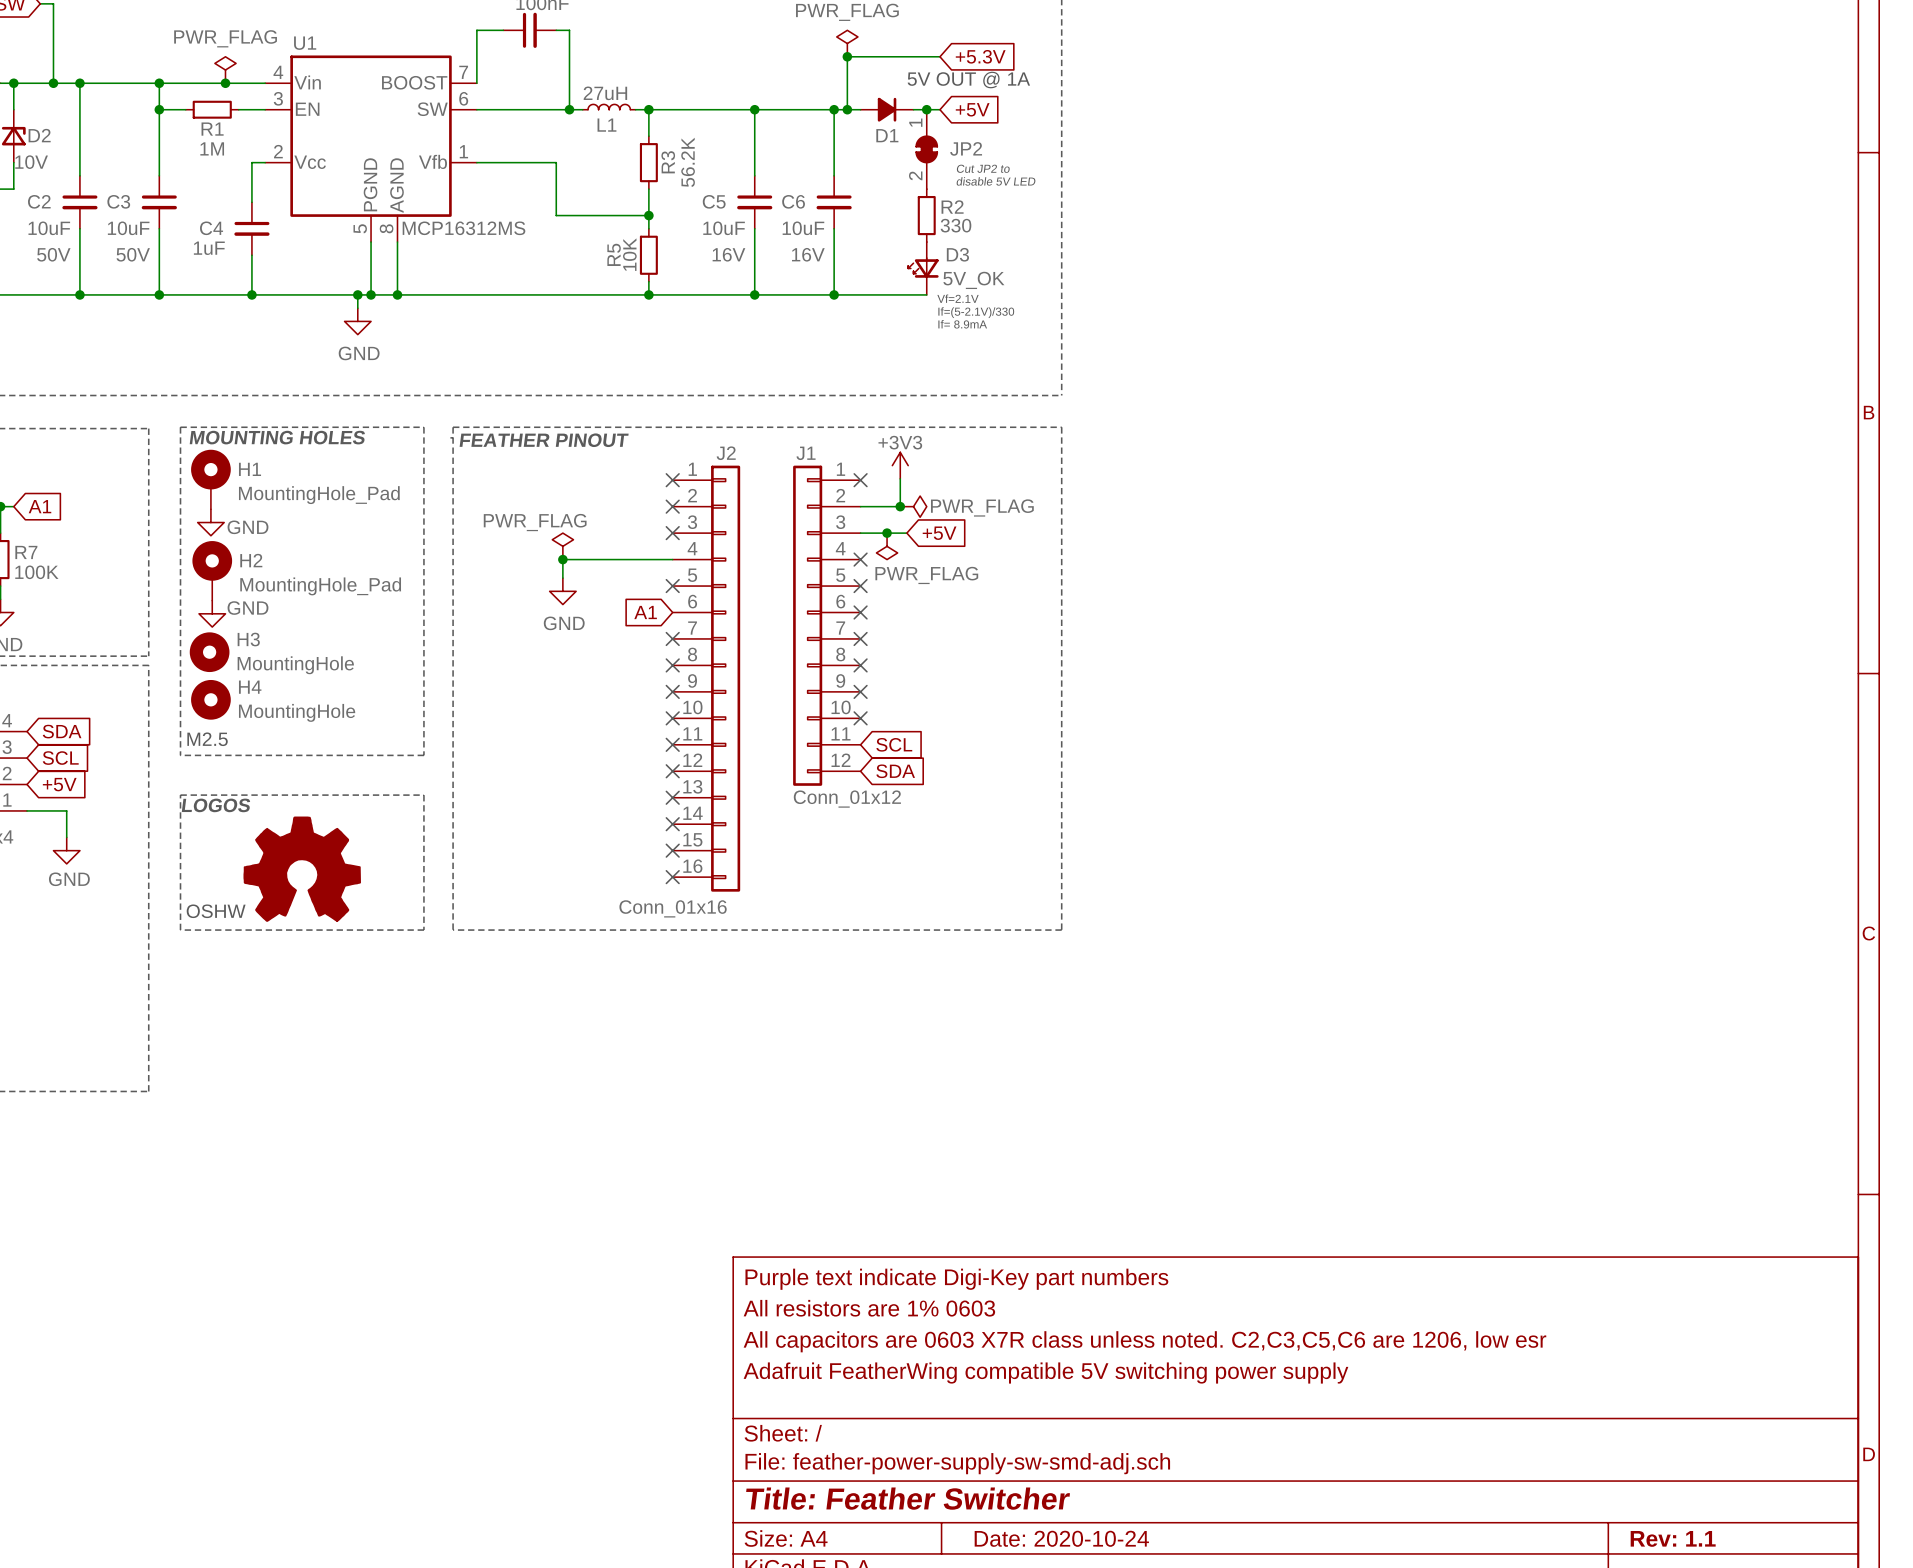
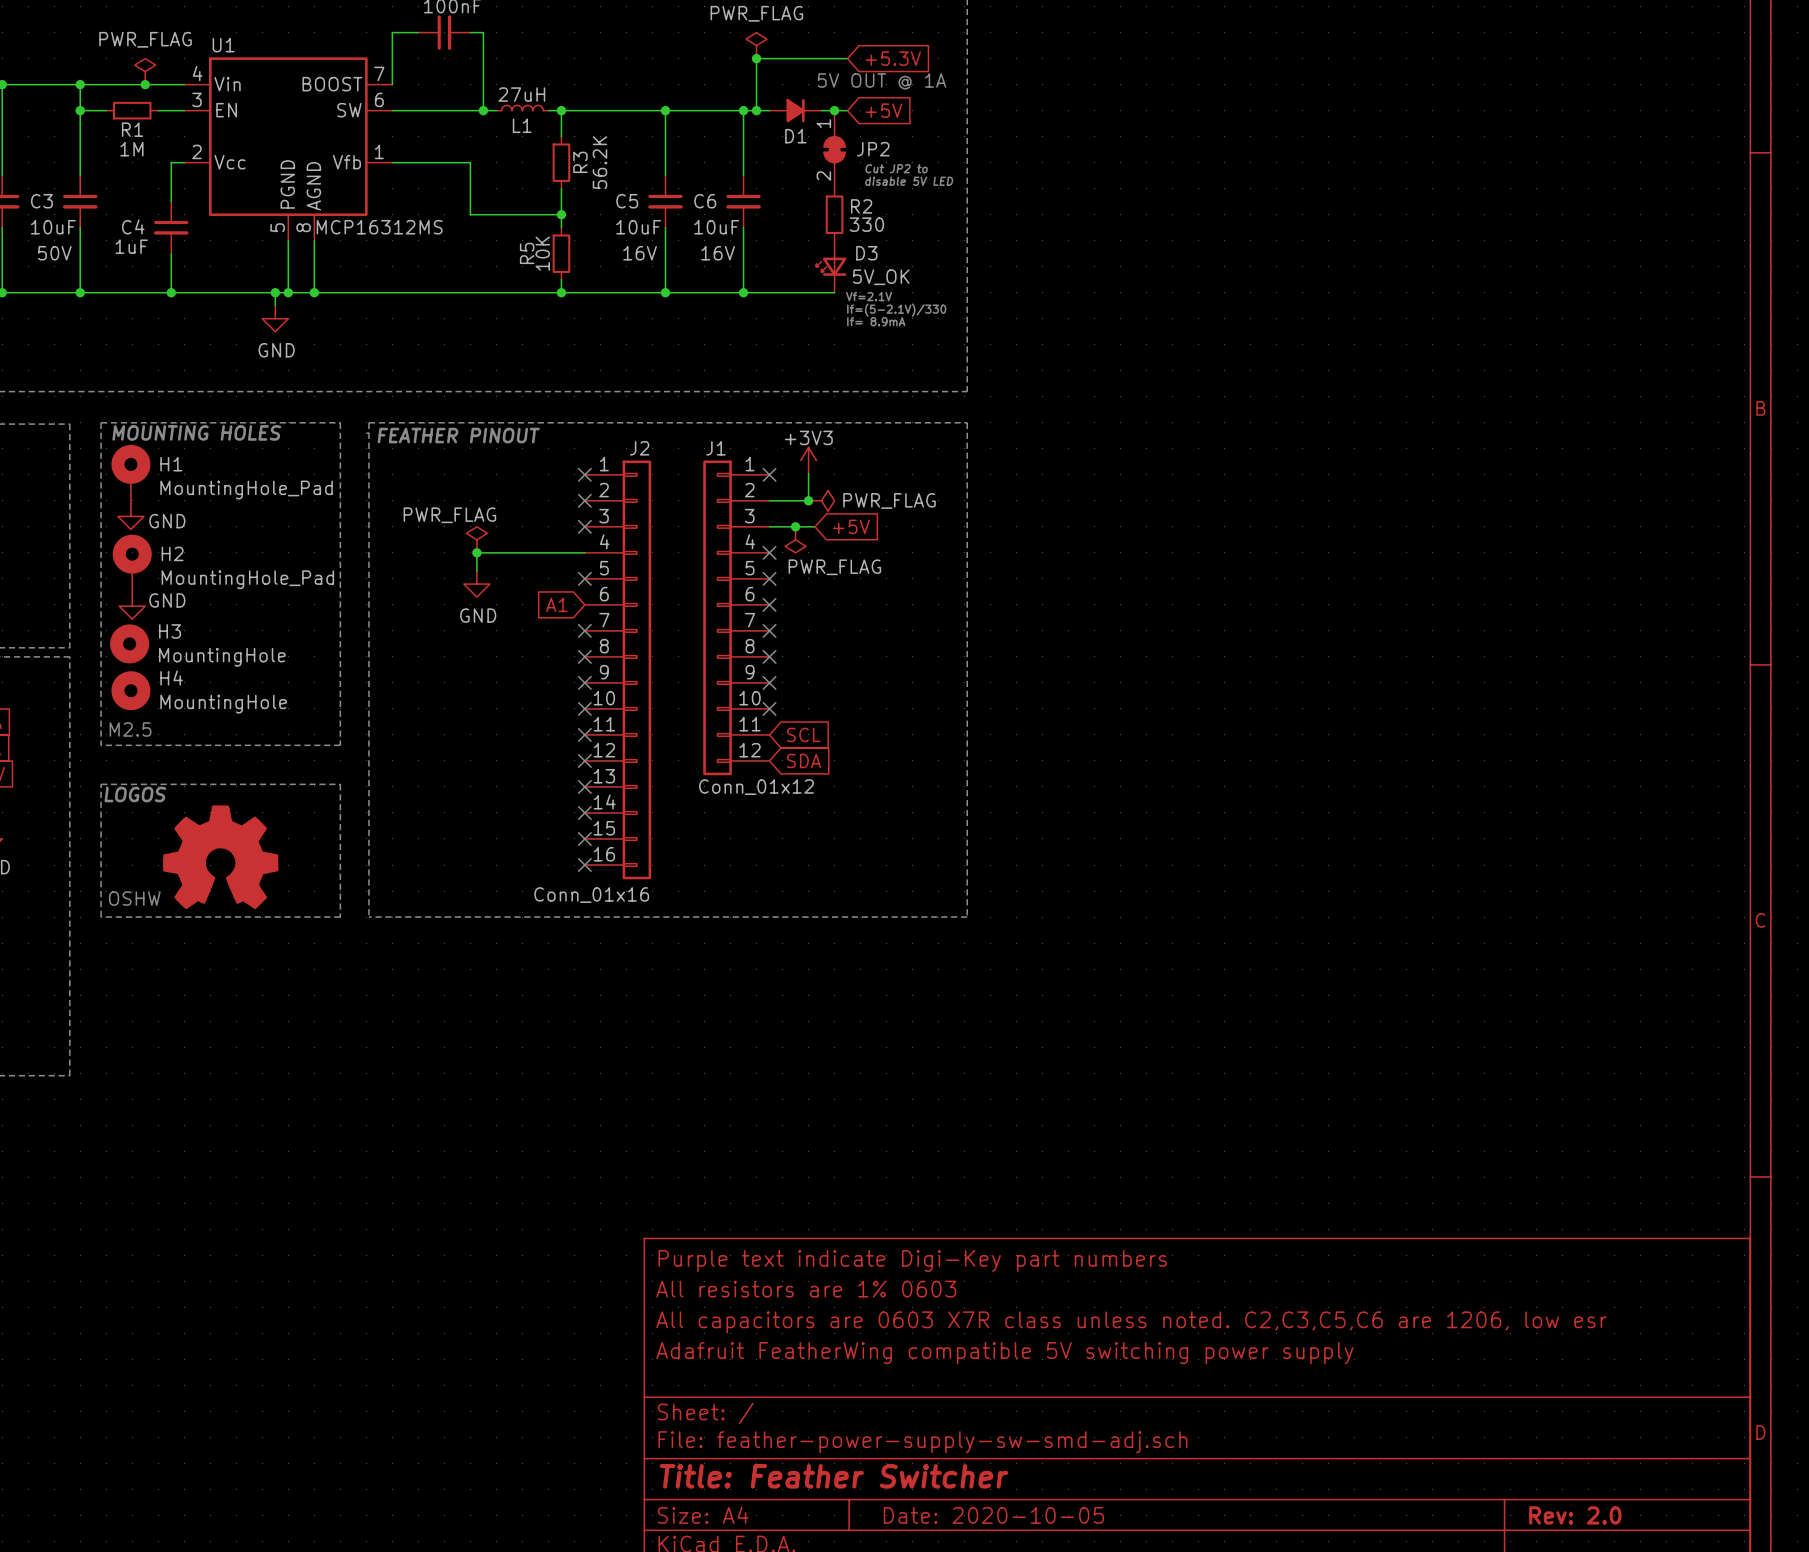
title block: Date: 2020-10-24 (1061, 1538) -> Date: 2020-10-05 (993, 1515)
title block: Rev: 1.1 (1673, 1538) -> Rev: 2.0 (1575, 1515)

